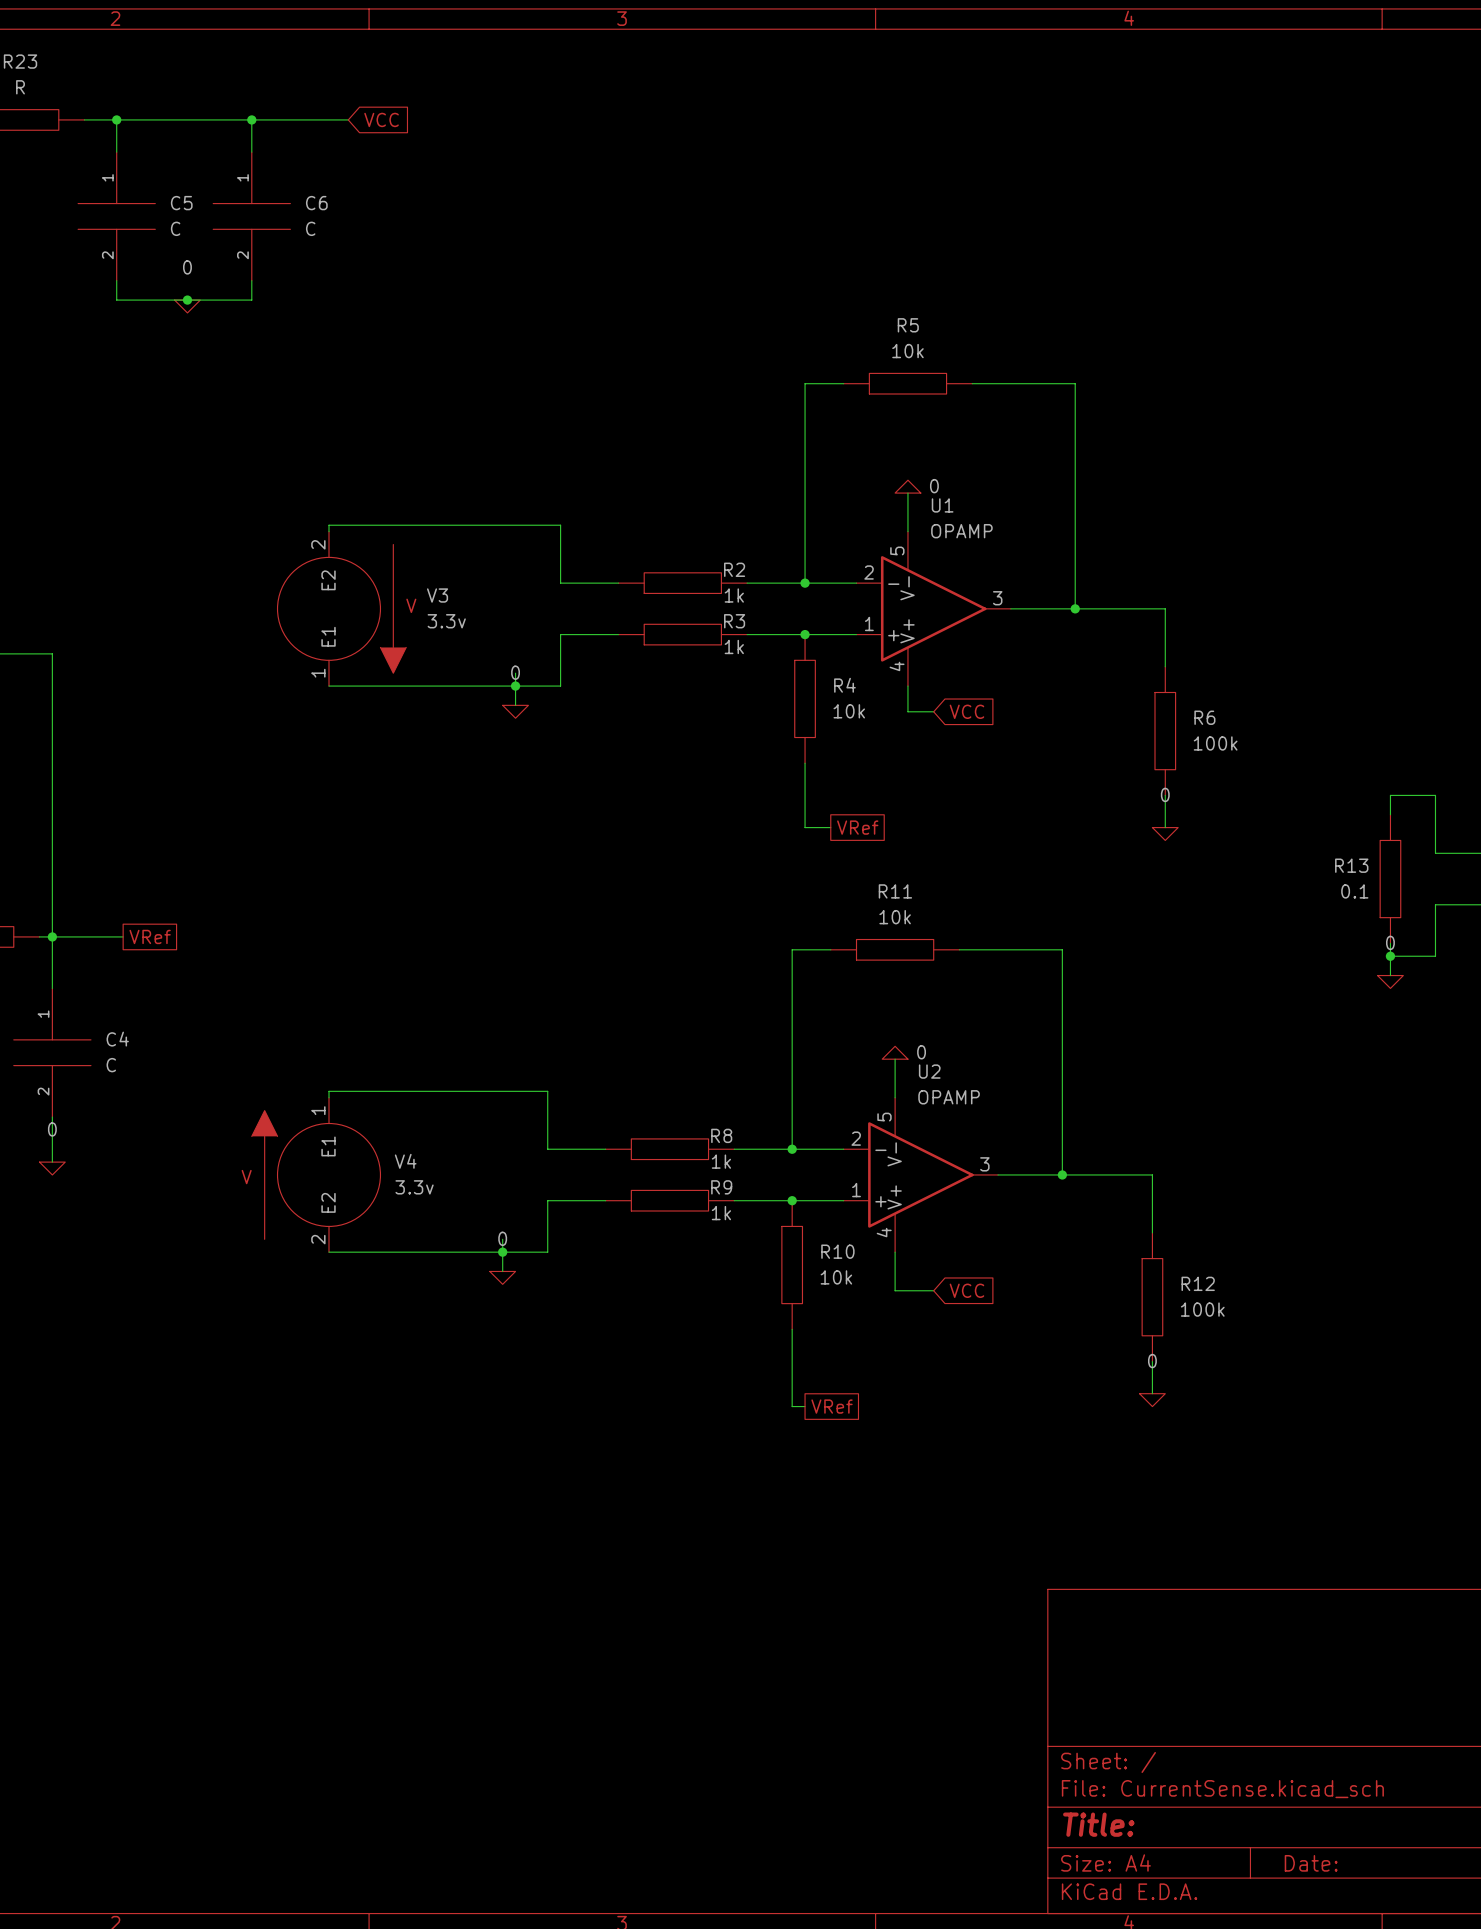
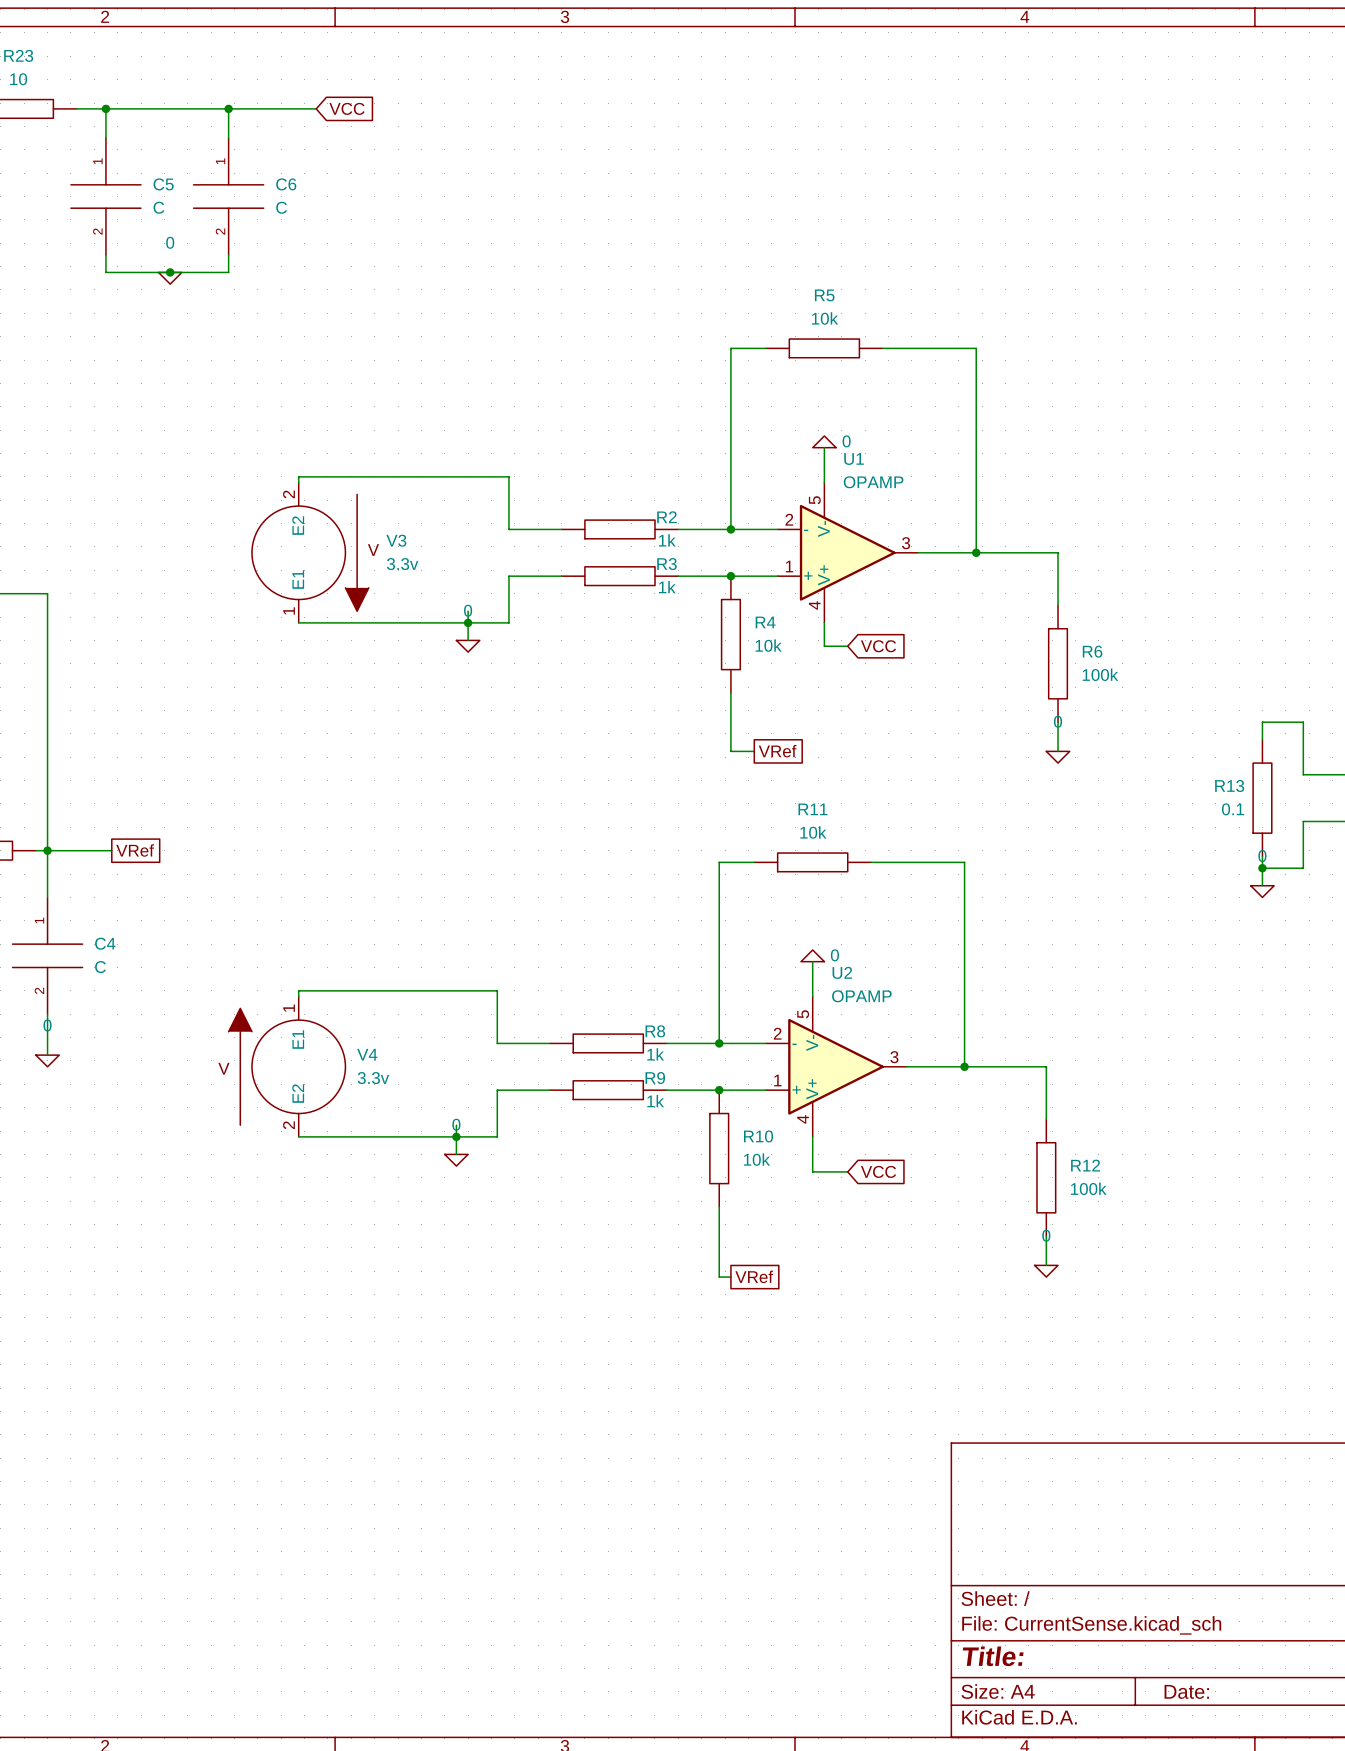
R23 value: R (20, 87) -> 10 (18, 79)

